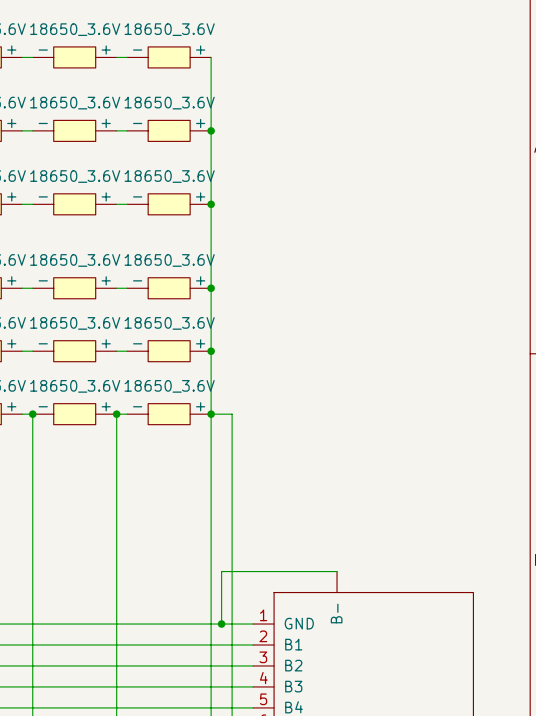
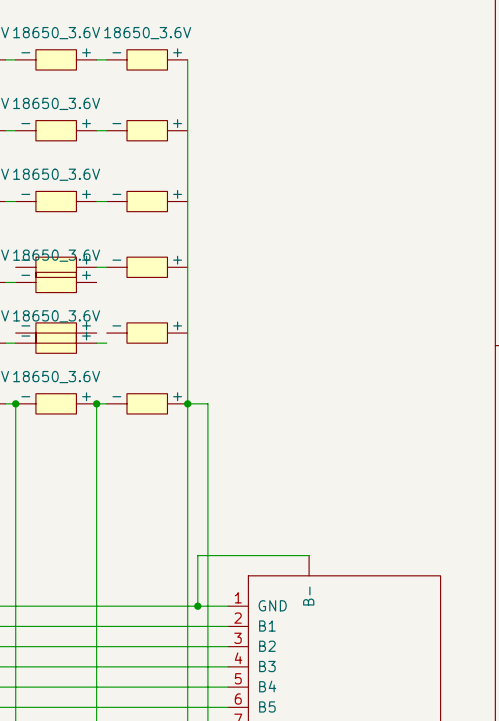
part value: 18650_3.6V (169, 103) -> none
junction: (211, 130) -> none
part value: 18650_3.6V (169, 176) -> none
junction: (211, 204) -> none
part: none -> (56, 267)
part: none -> (147, 267)
wire: (116, 288) (127, 288) -> (96, 267) (106, 267)
part: 18650_3.6V (169, 288) -> none
junction: (211, 288) -> none
part: none -> (56, 333)
part: none -> (147, 333)
part: 18650_3.6V (169, 351) -> none
junction: (211, 351) -> none
part value: 18650_3.6V (169, 386) -> none

